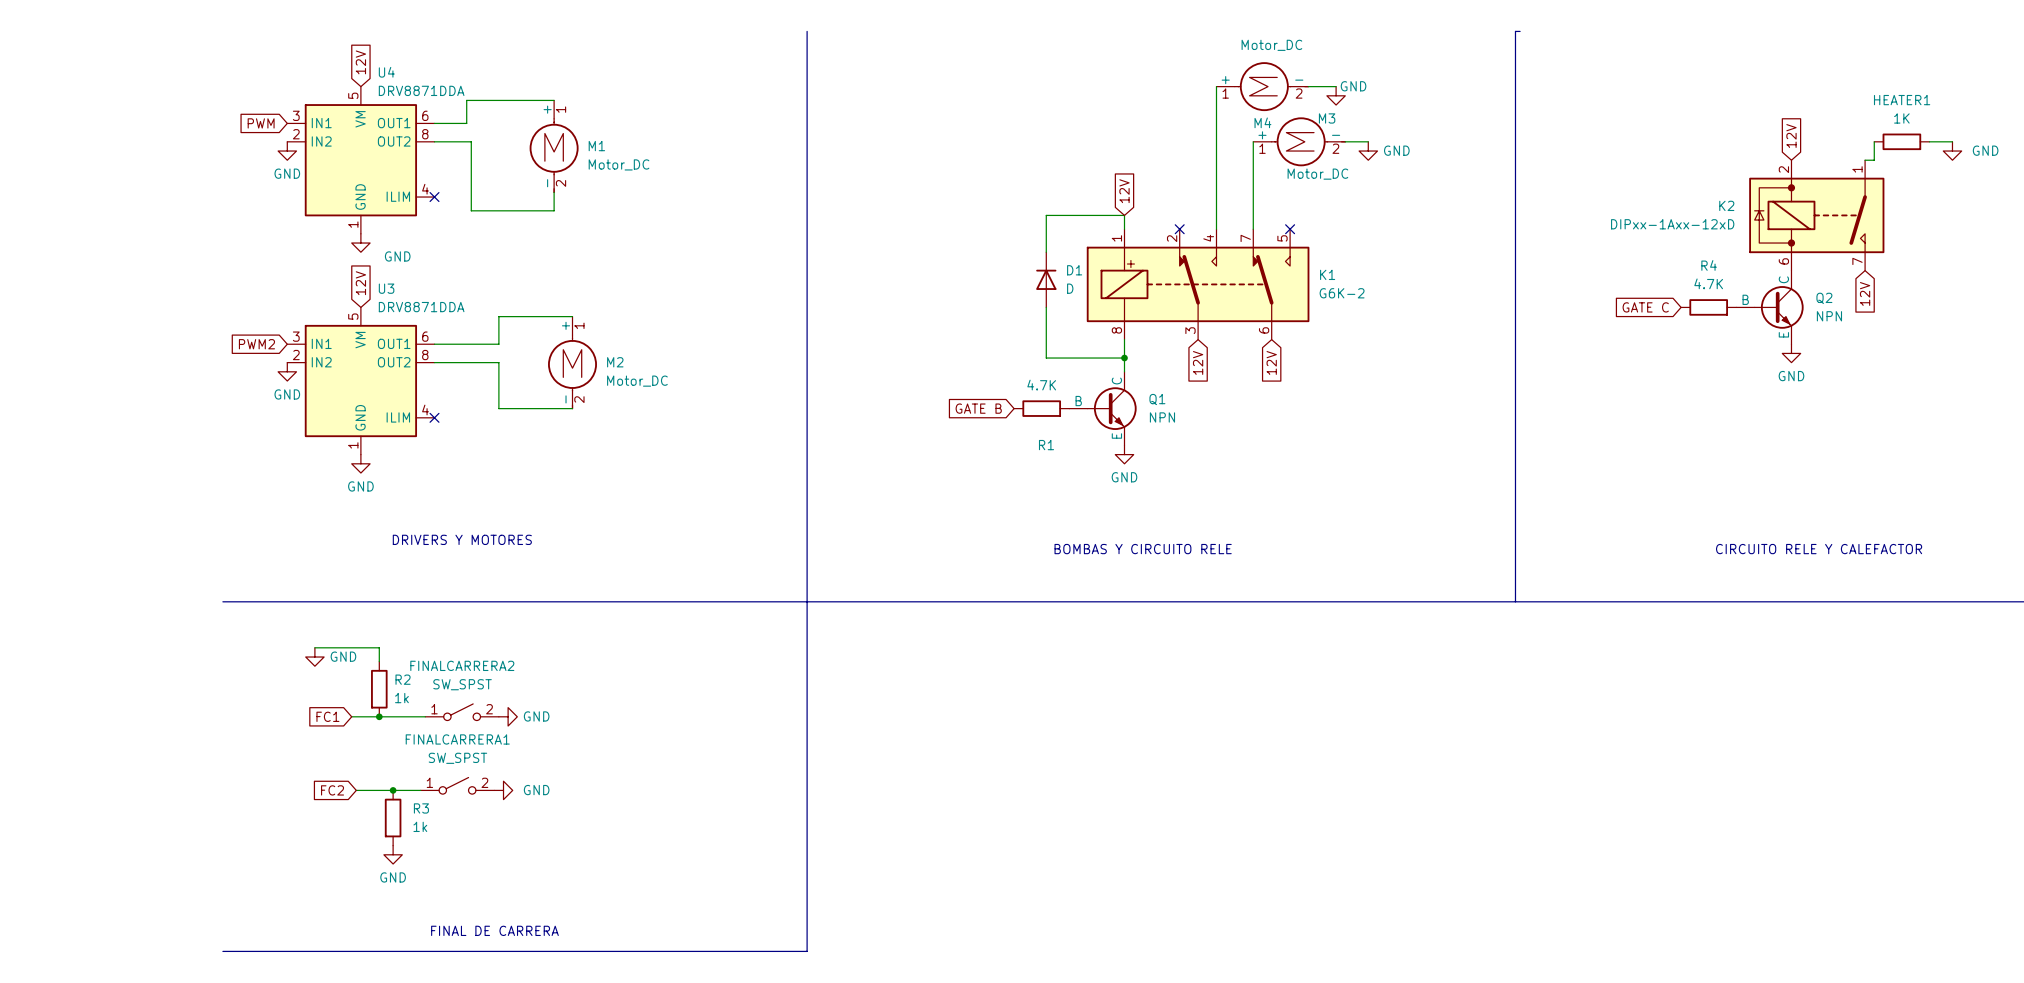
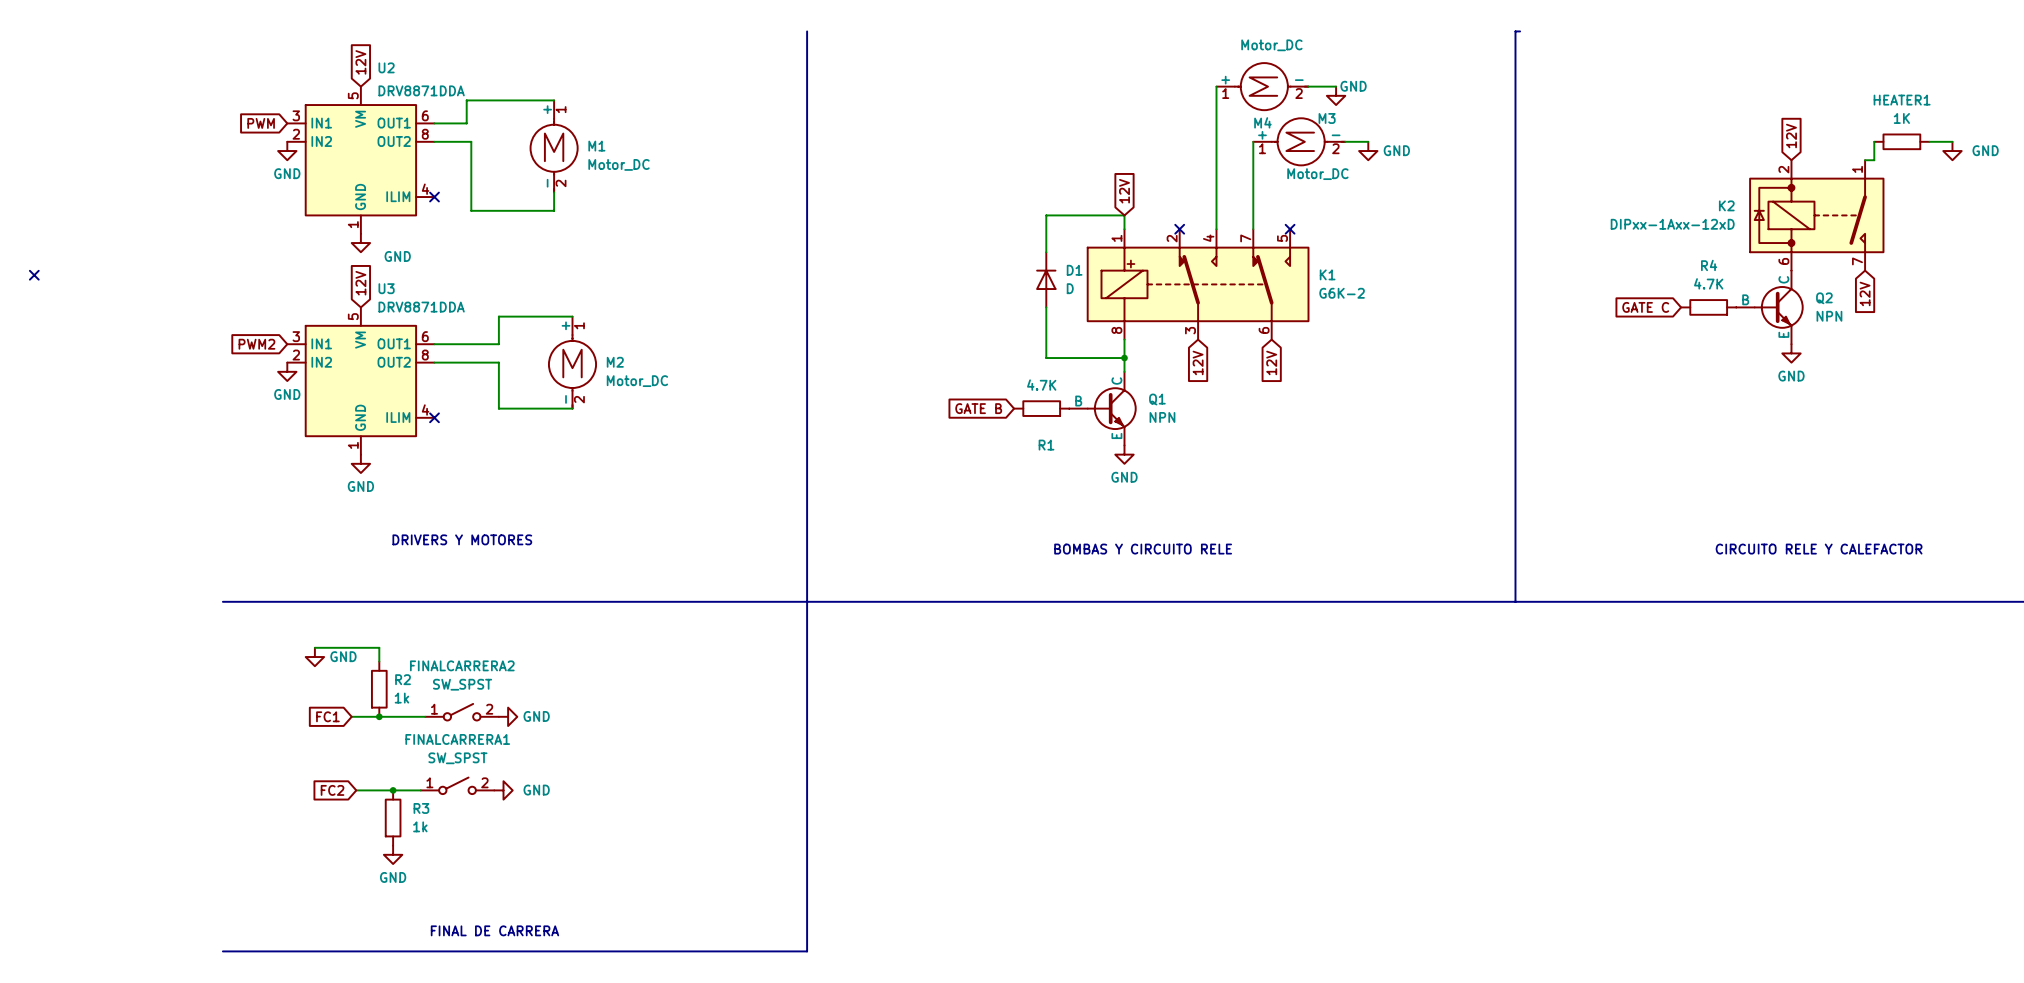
U4 name: U4 (386, 72) -> U2 (386, 67)
no-connect mark: none -> (34, 275)

